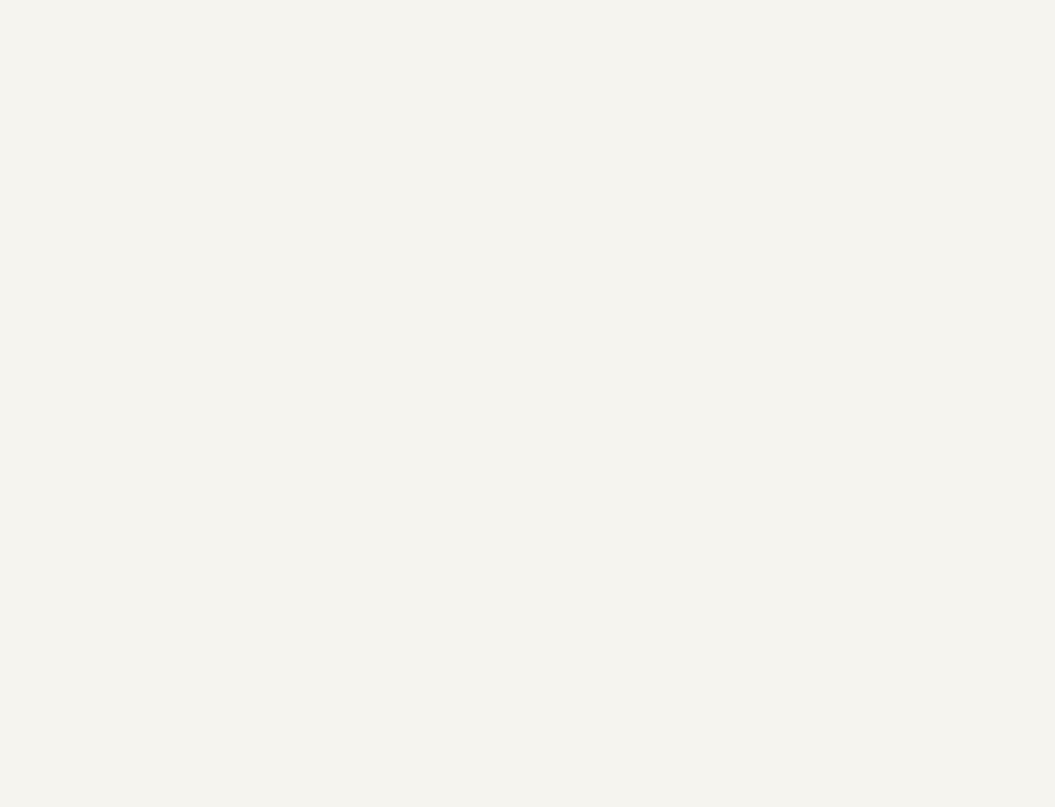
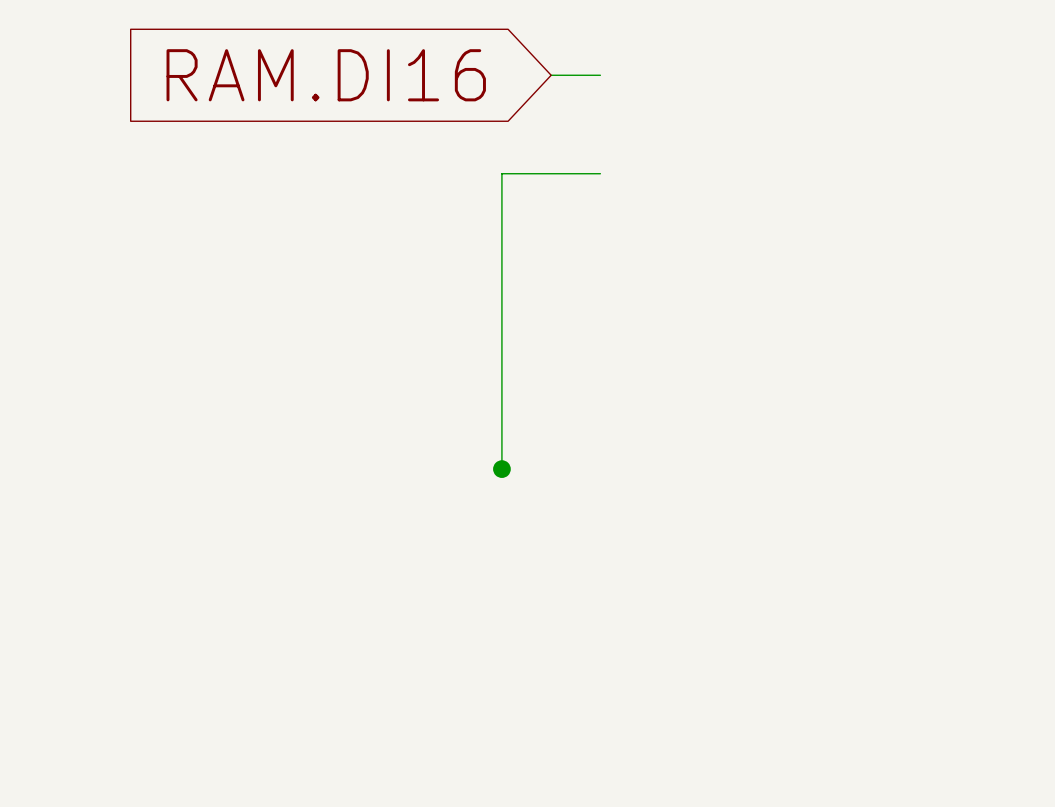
global label: none -> RAM.DI16 (326, 75)
wire: none -> (551, 75) (600, 75)
wire: none -> (600, 173) (501, 173) (501, 469)
junction: none -> (501, 469)

